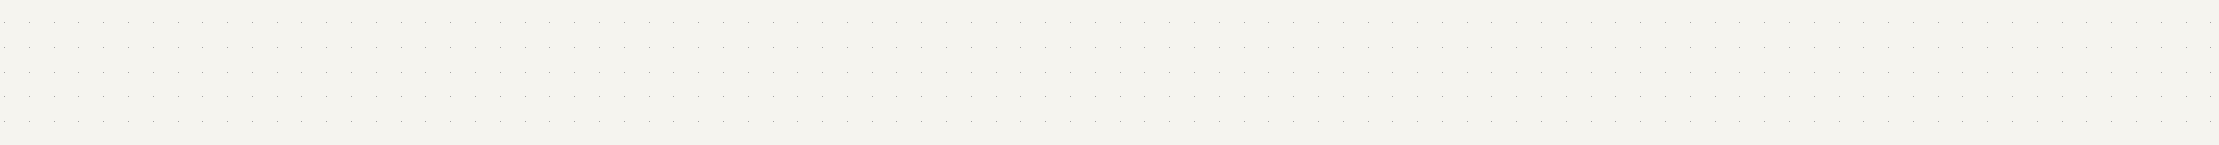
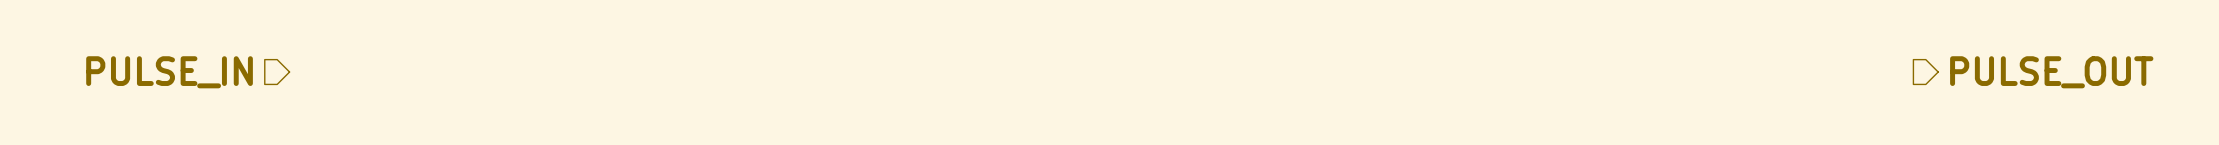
hierarchical label: none -> PULSE_IN (169, 72)
hierarchical label: none -> PULSE_OUT (2051, 72)

